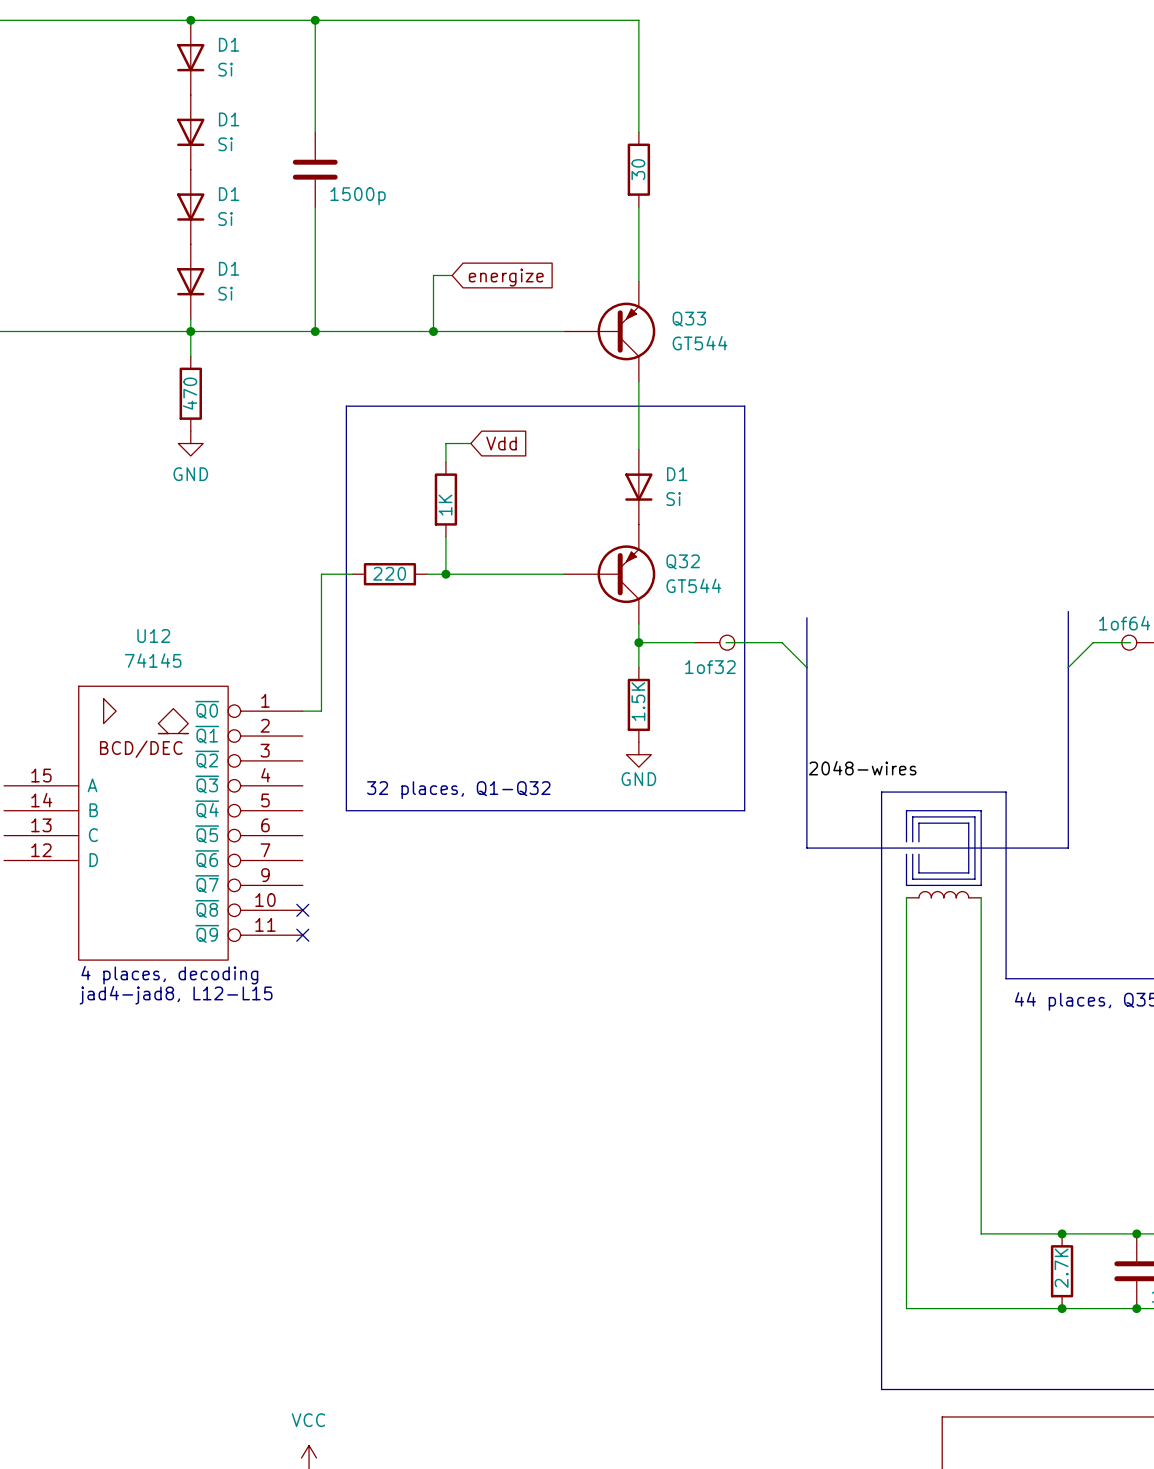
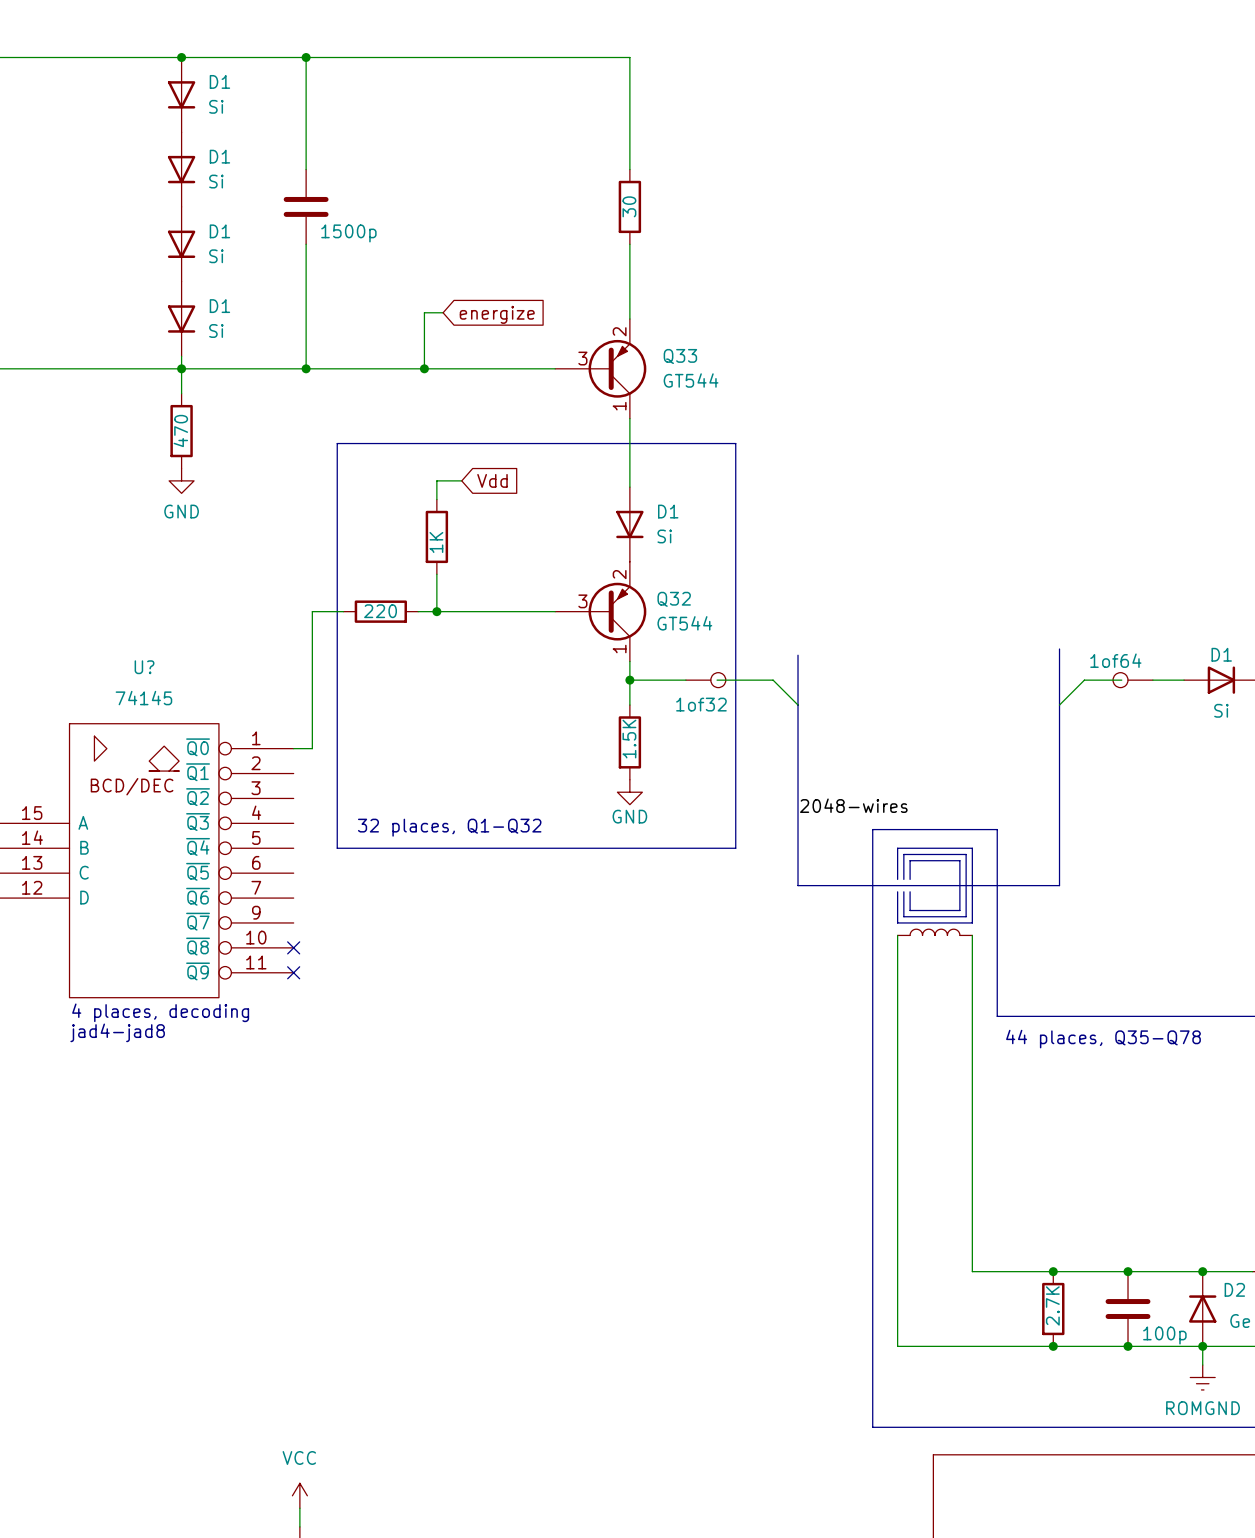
Q33 pin number: none -> 2 (619, 331)
Q33 pin number: none -> 3 (582, 358)
Q33 pin number: none -> 1 (619, 406)
Q32 pin number: none -> 2 (619, 574)
Q32 pin number: none -> 3 (582, 601)
Q32 pin number: none -> 1 (619, 649)
U12 name: U12 (153, 635) -> U? (144, 667)
text: jad4-jad8, L12-L15 (176, 995) -> jad4-jad8 (117, 1032)

